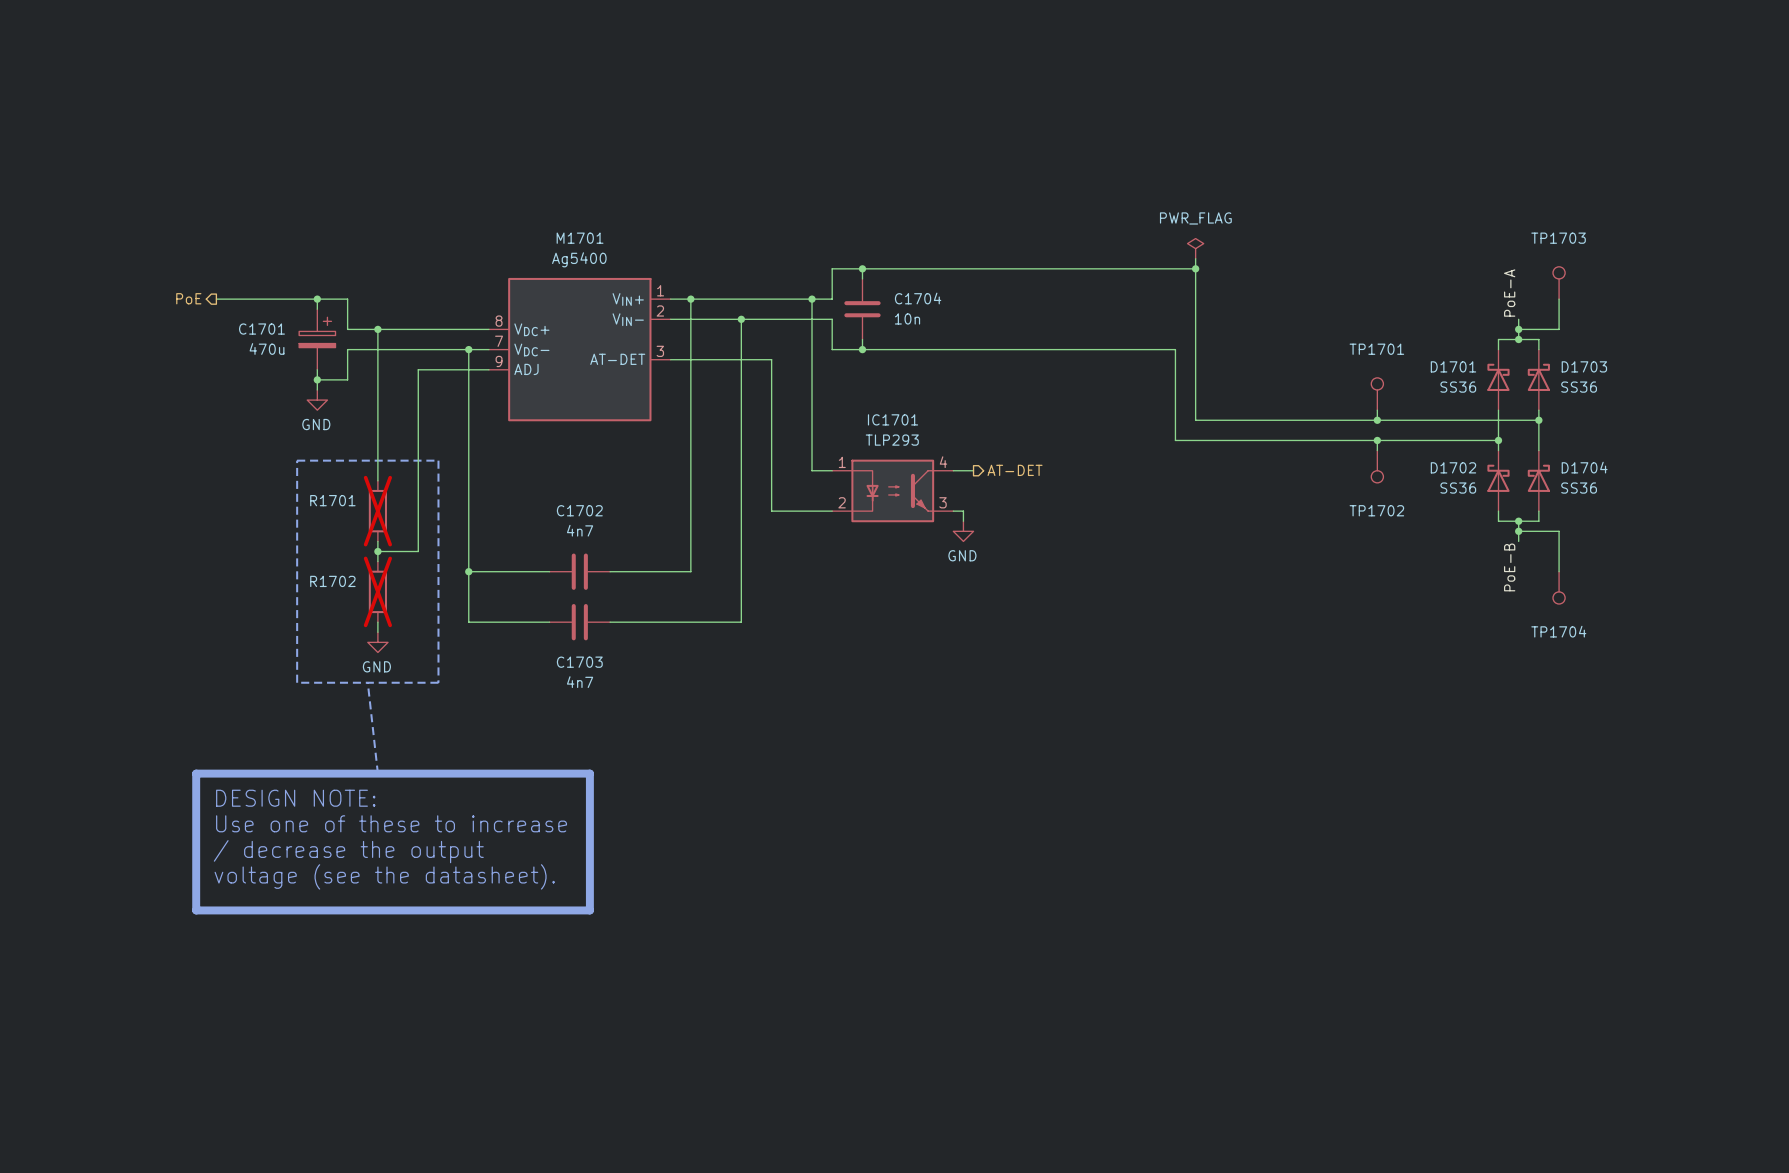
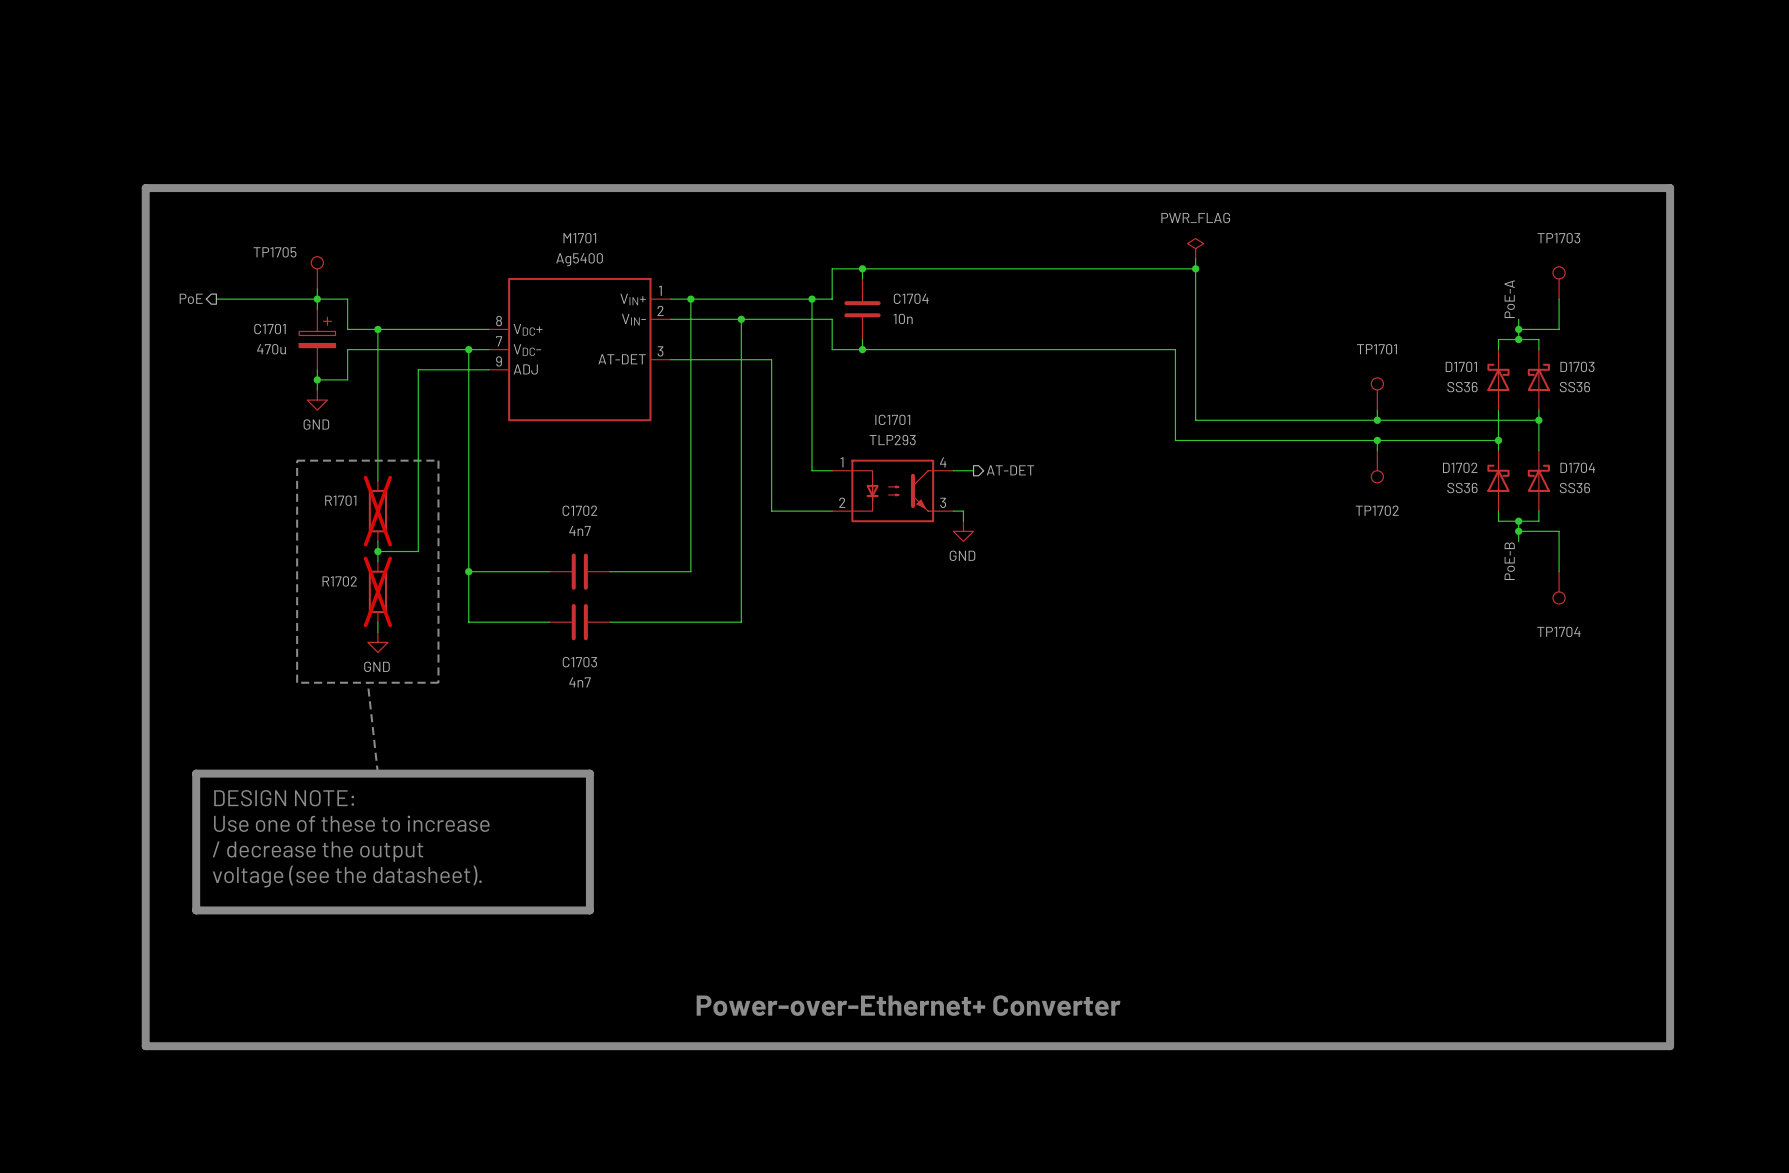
line: none -> (145, 188) (1670, 188) (1670, 1046) (145, 1046) (145, 188)
TP1705: none -> (317, 272)
wire: none -> (317, 289) (317, 299)
text: none -> Power-over-Ethernet+ Converter (908, 1005)

